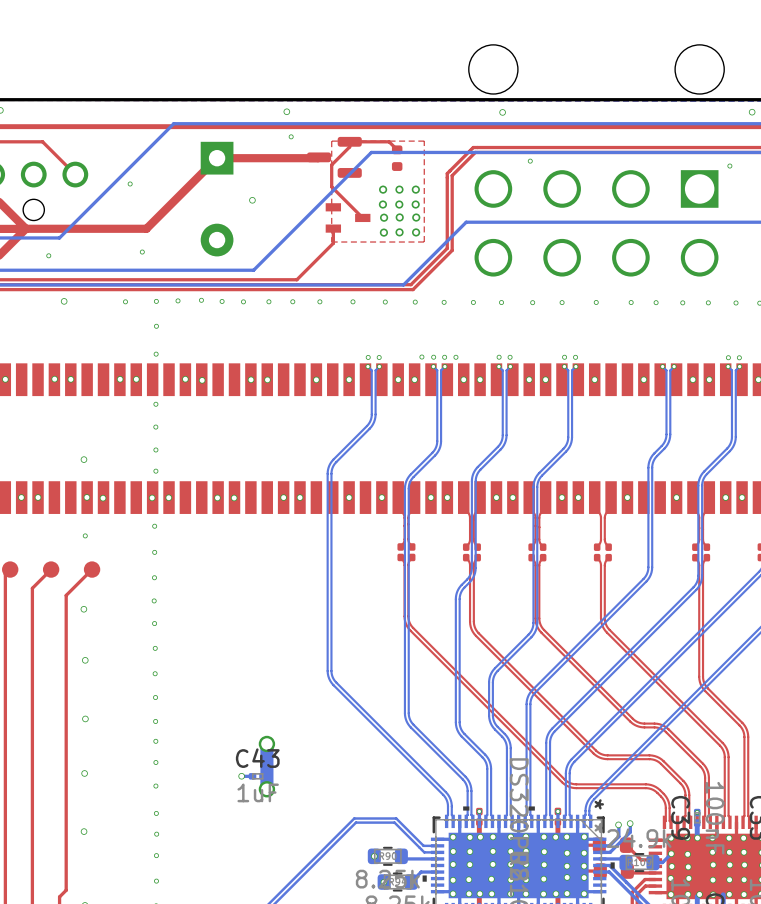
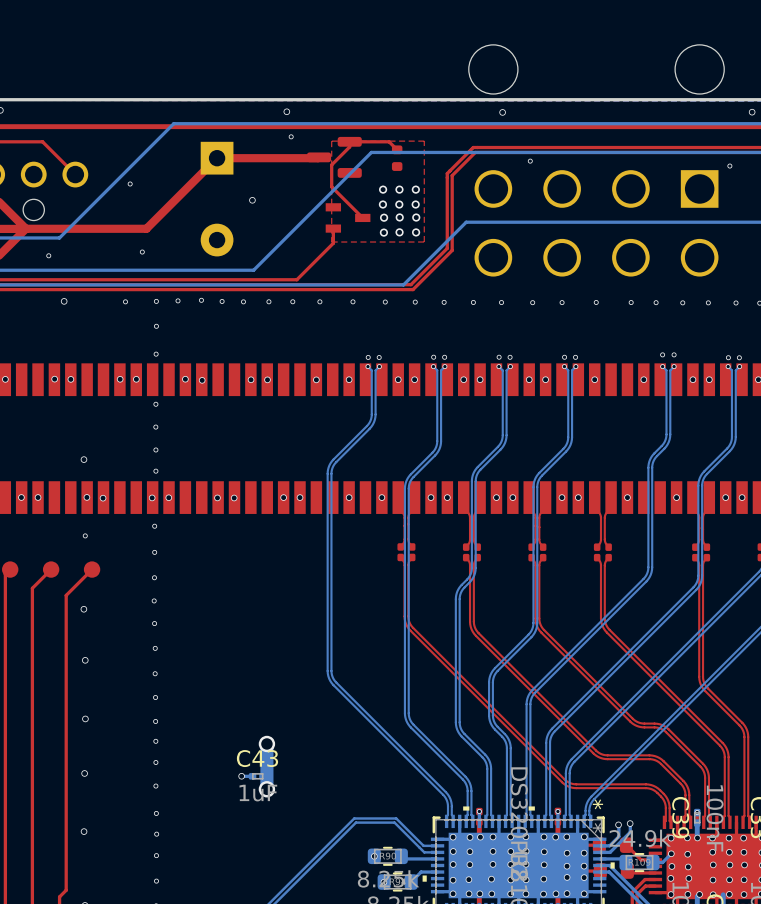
via: none -> (662, 354)
via: none -> (674, 354)
via: (421, 357) -> none
via: (455, 357) -> none

